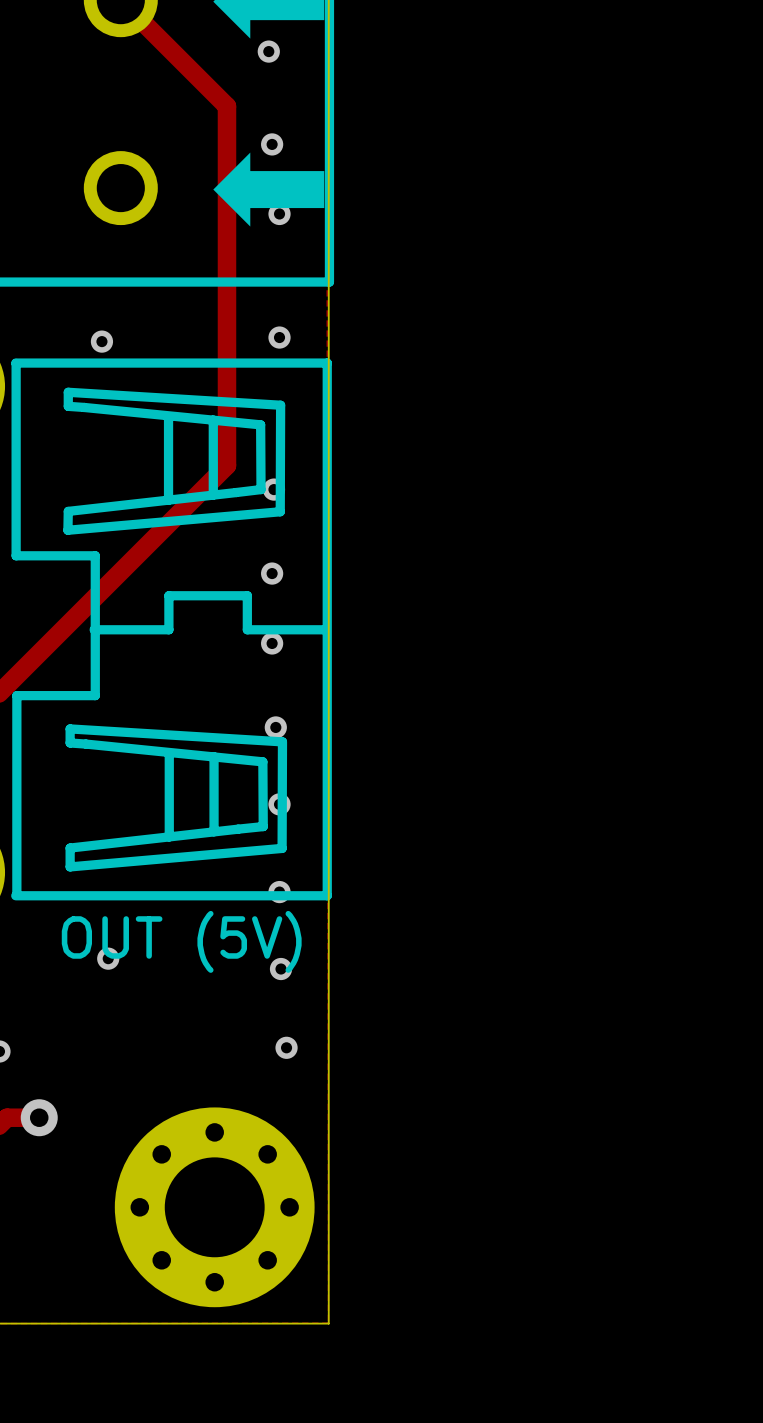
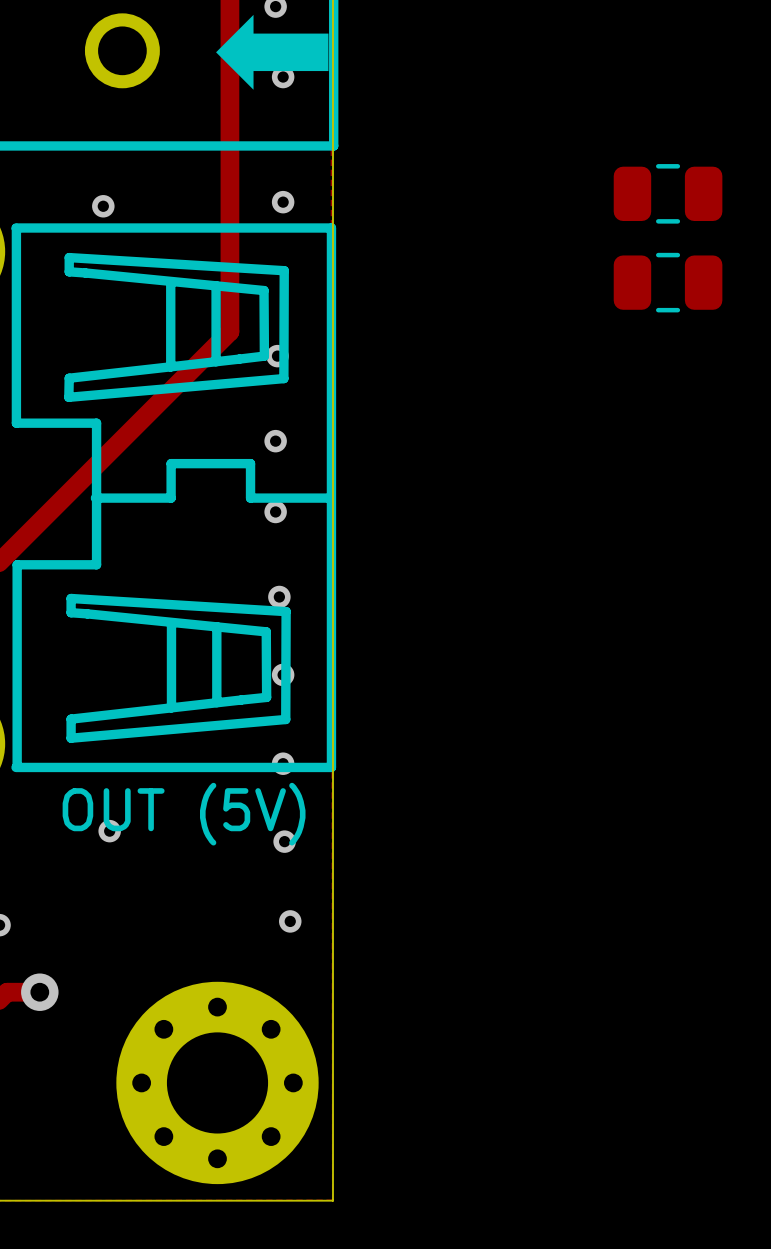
part: none -> (668, 193)
part: none -> (668, 282)

